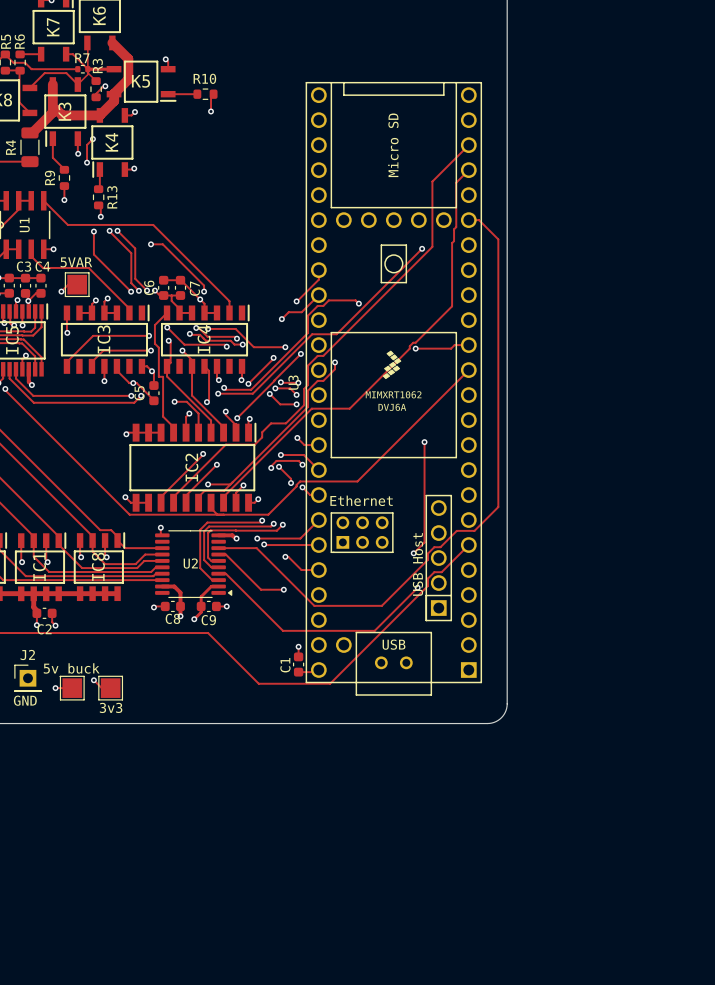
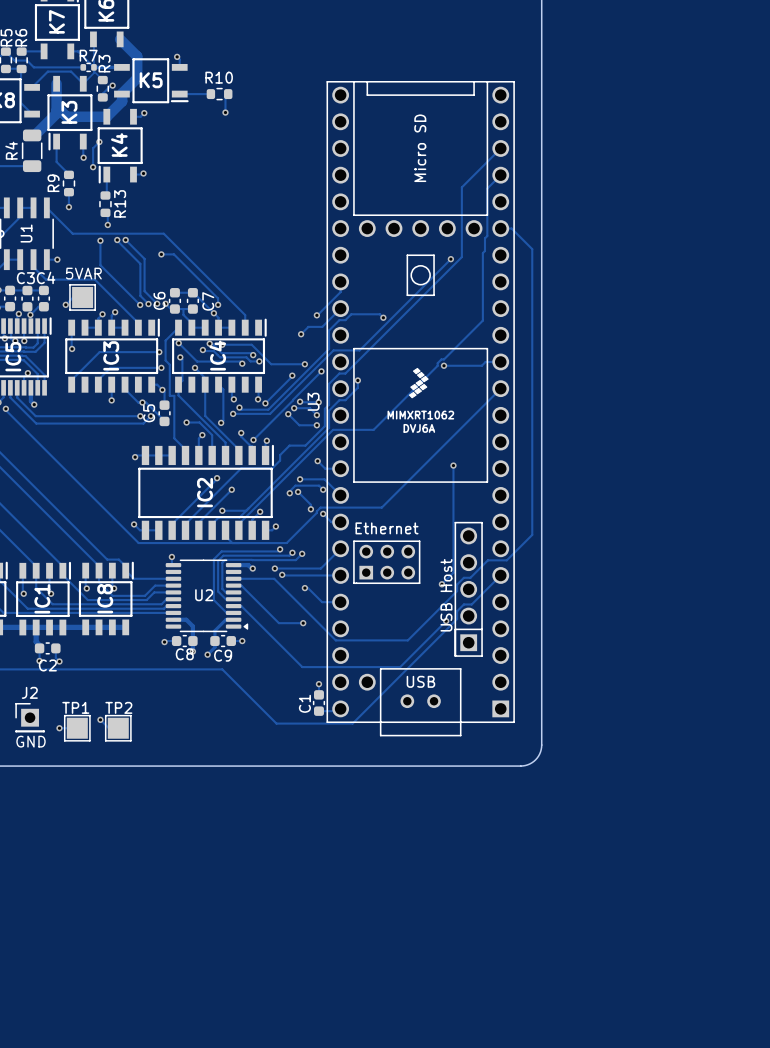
5v_buck name: 5v_buck (71, 669) -> TP1 (75, 707)
3v3 name: 3v3 (111, 707) -> TP2 (118, 707)

